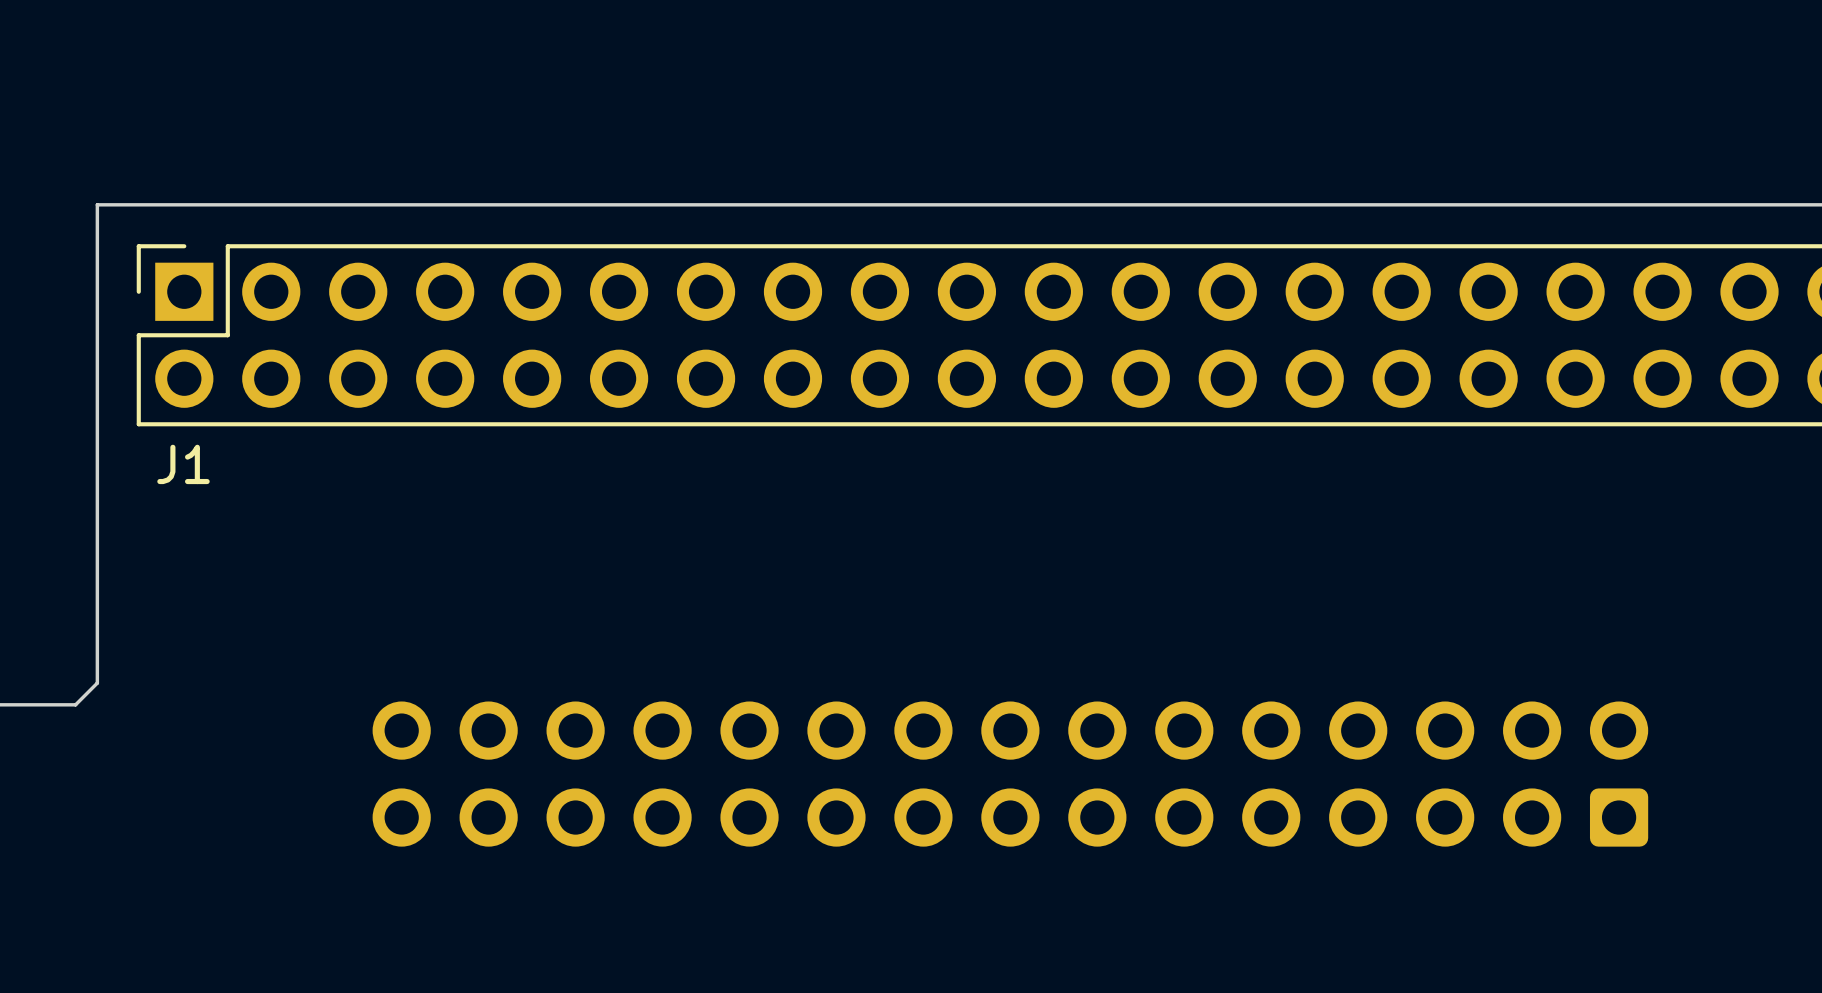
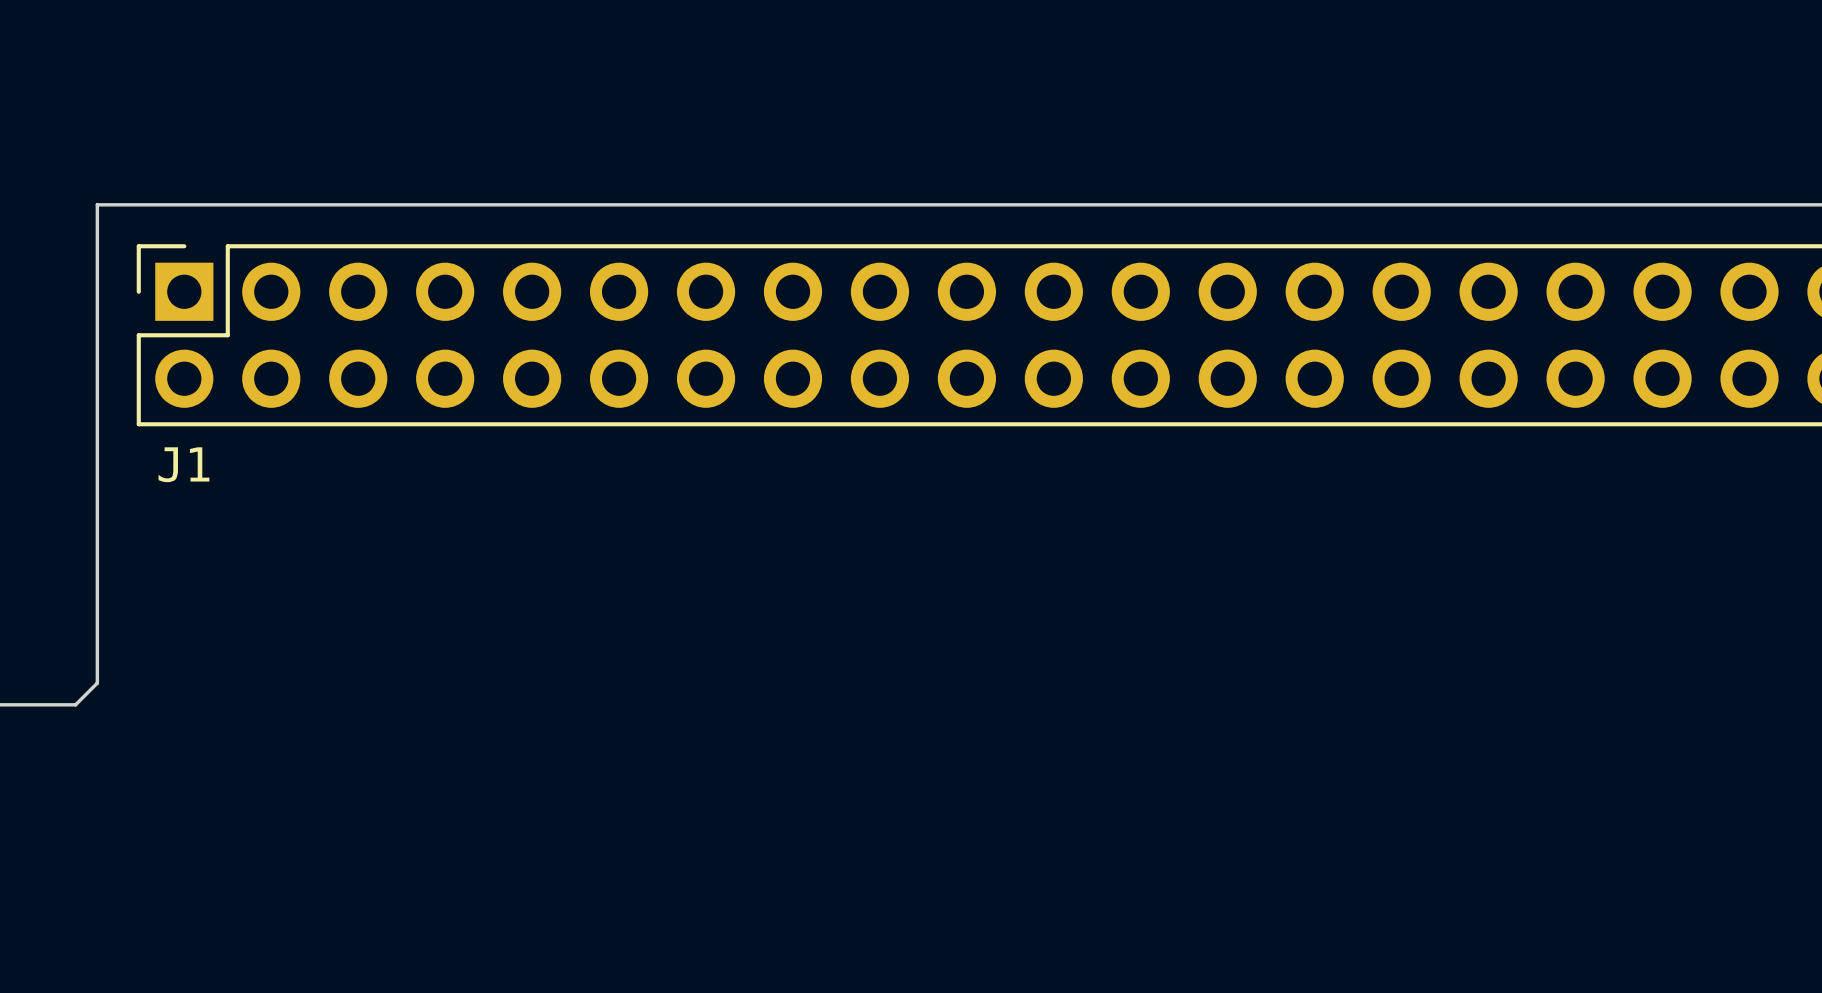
part: (1010, 774) -> none

